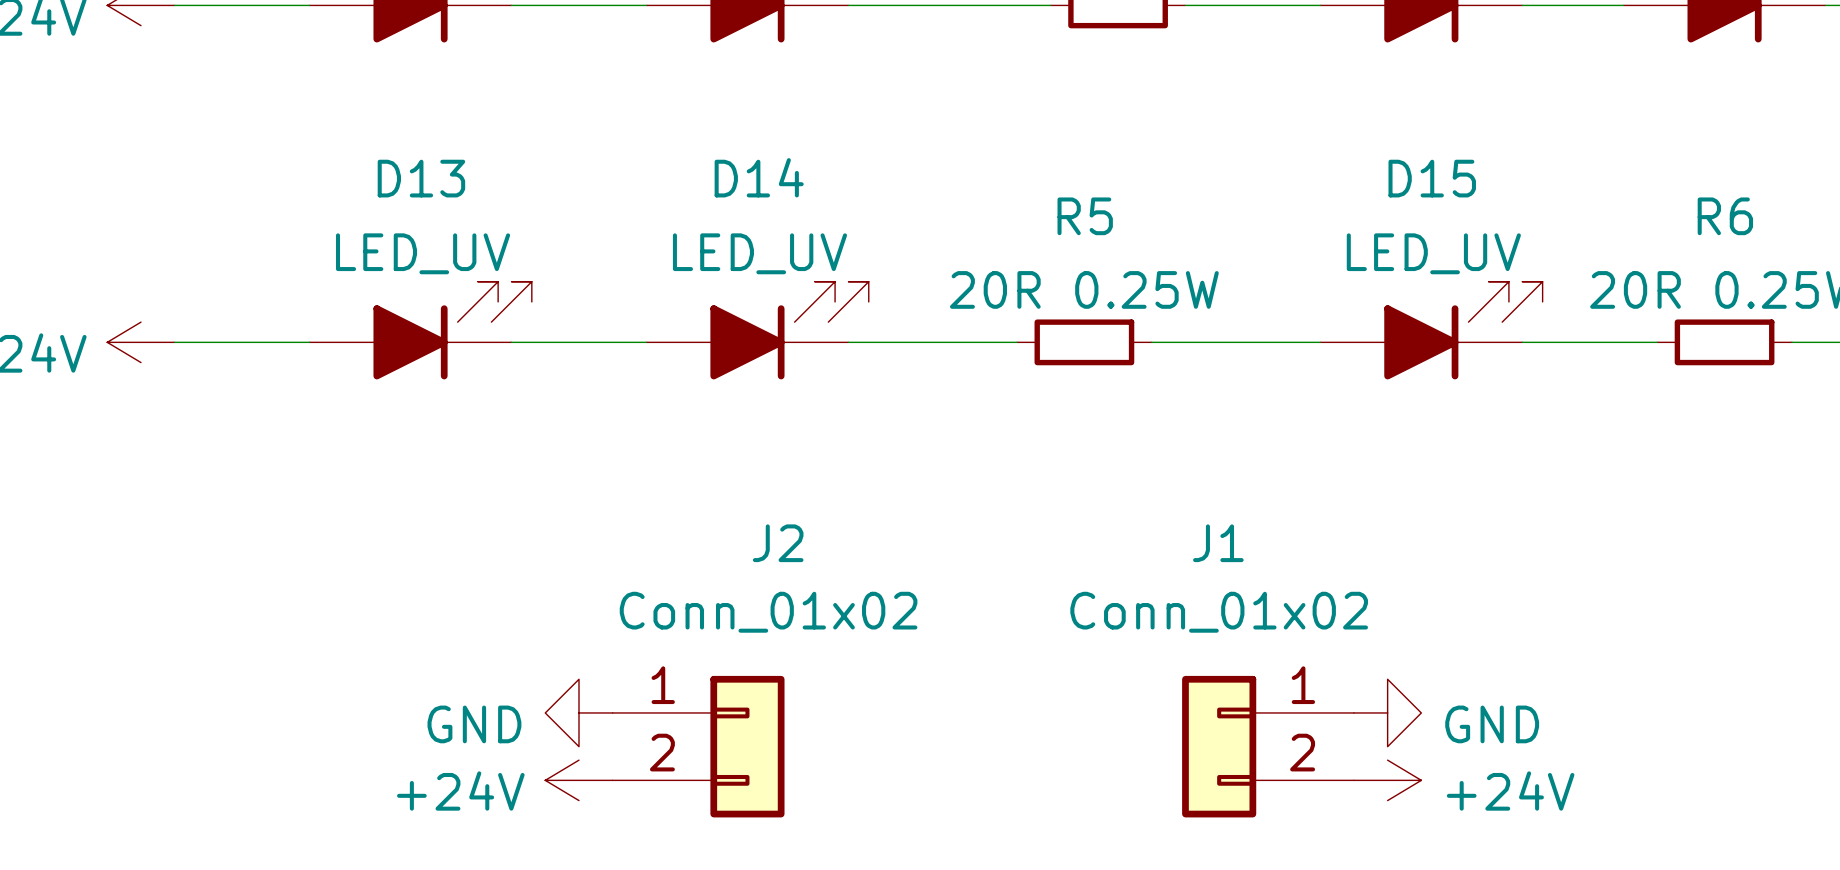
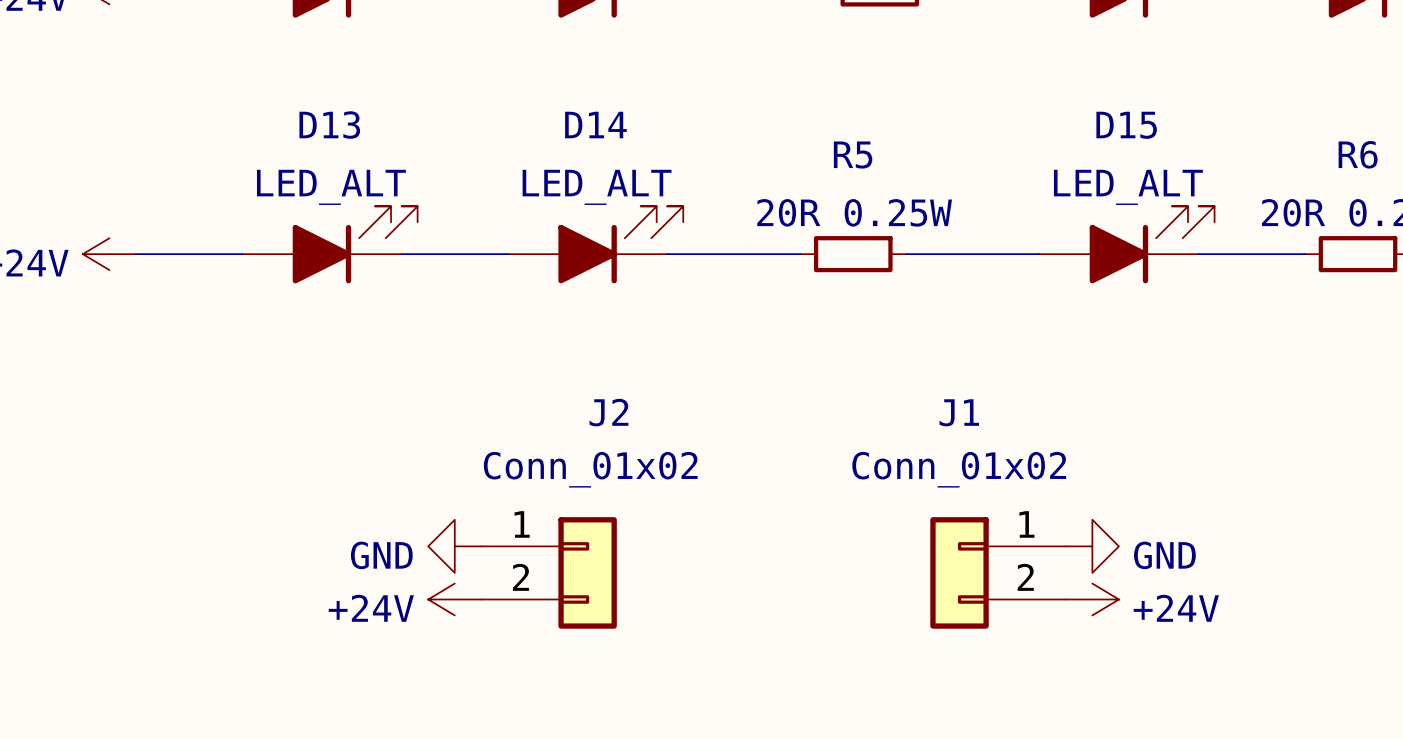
D13 value: LED_UV (423, 253) -> LED_ALT (331, 187)
D14 value: LED_UV (759, 253) -> LED_ALT (597, 187)
D15 value: LED_UV (1433, 253) -> LED_ALT (1128, 187)

